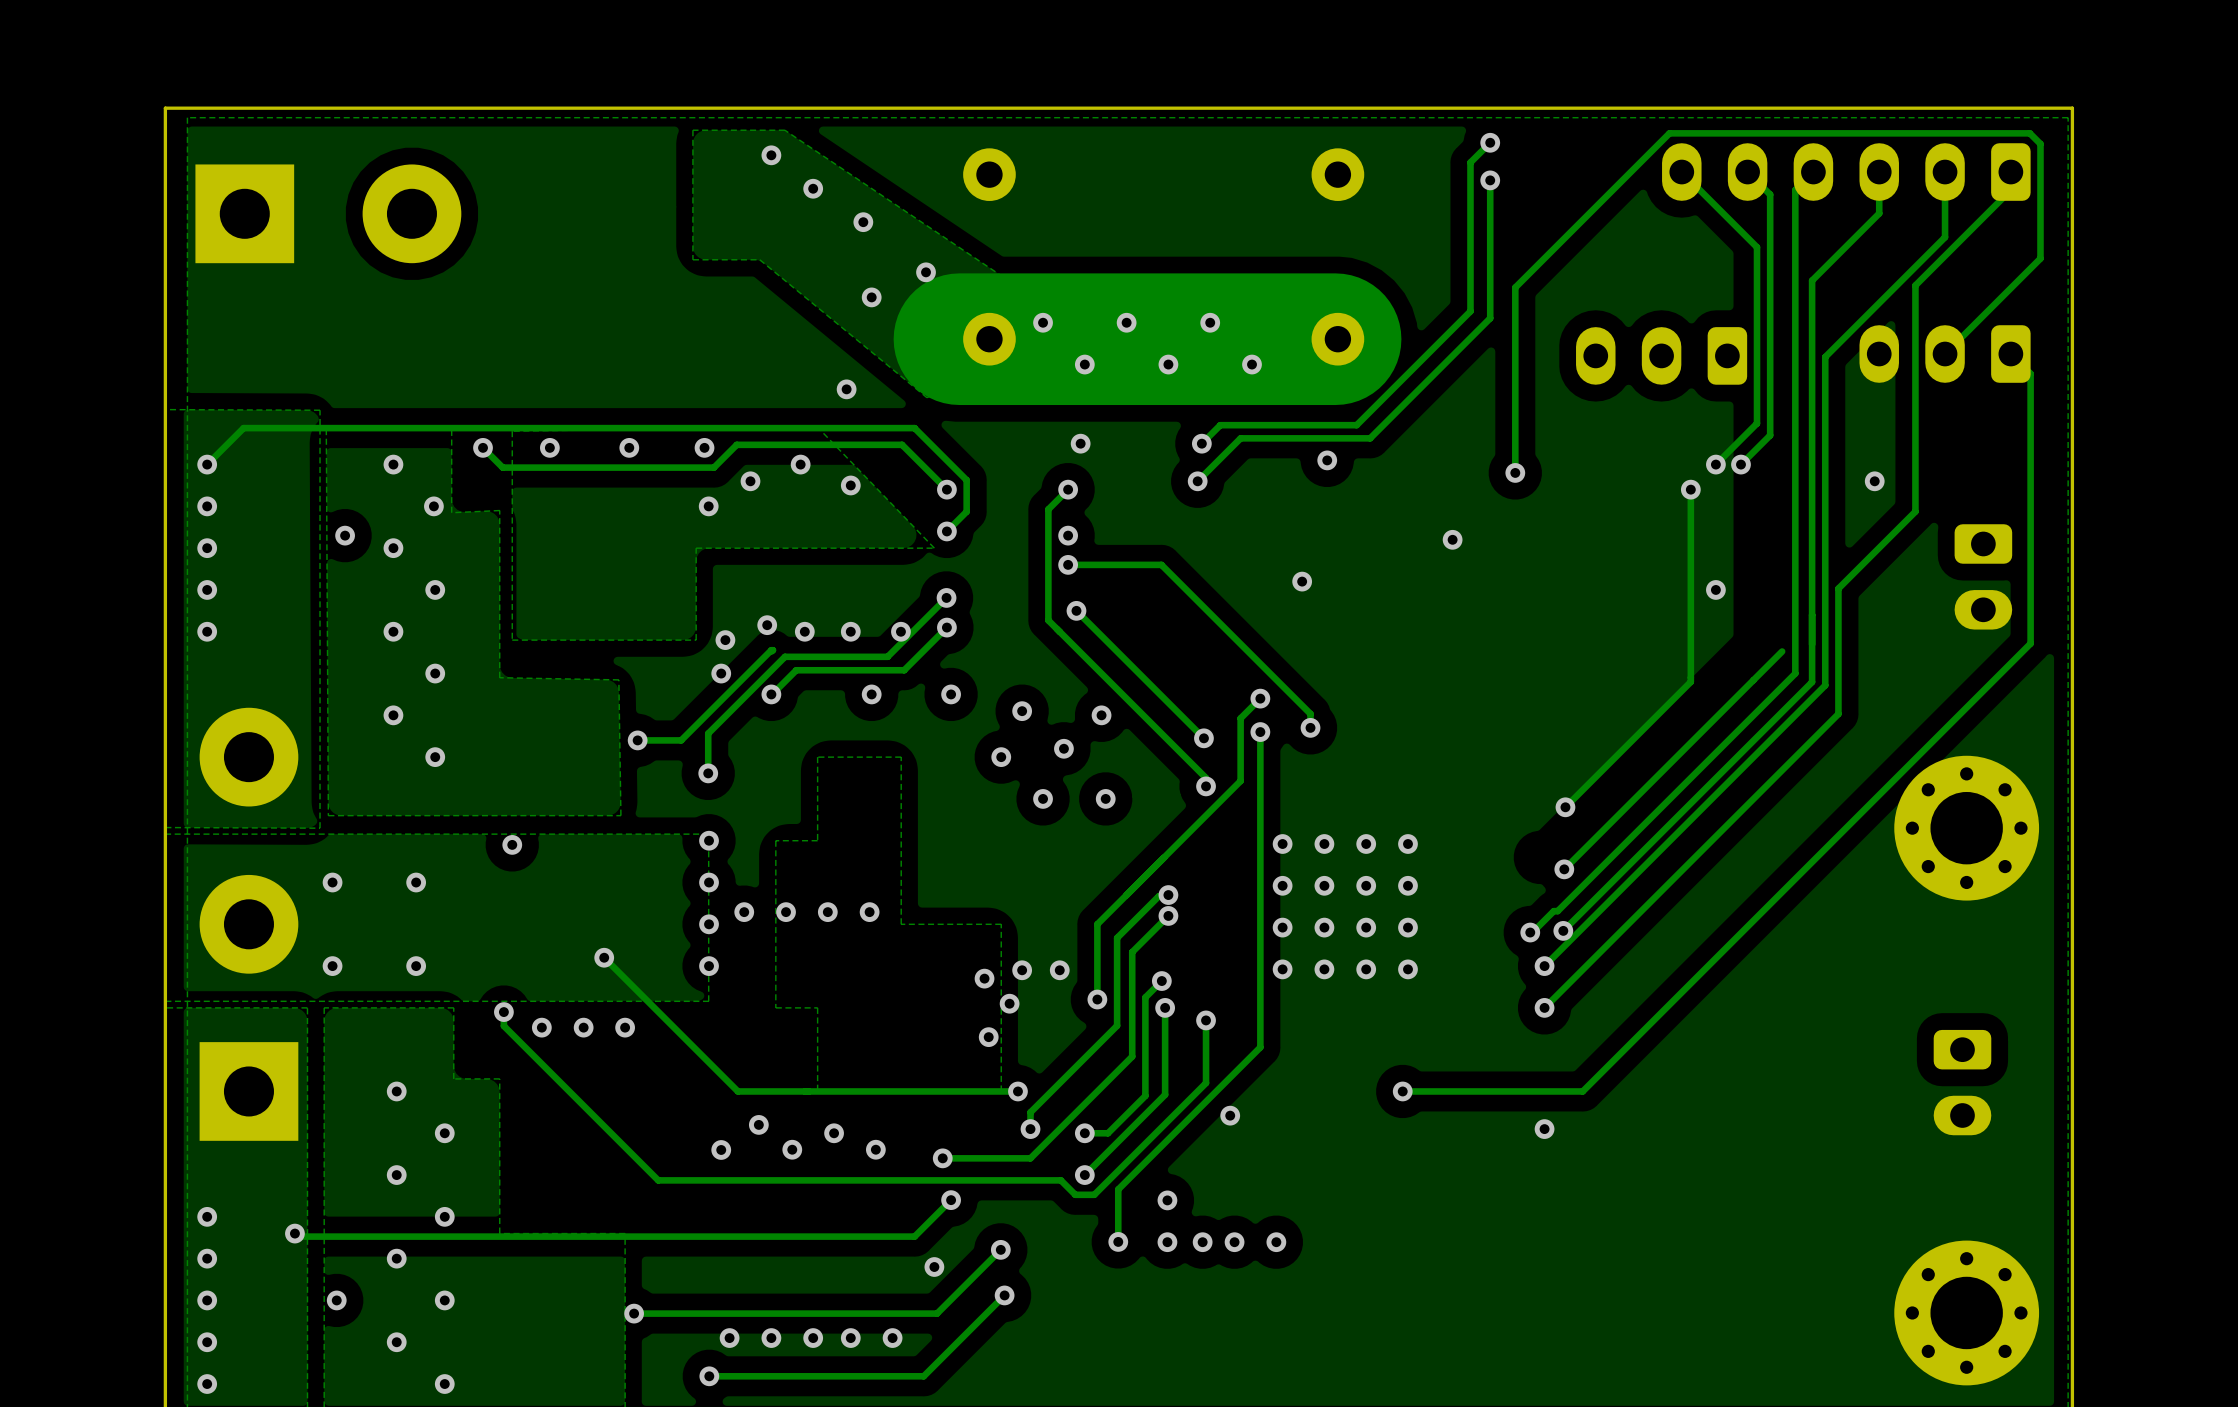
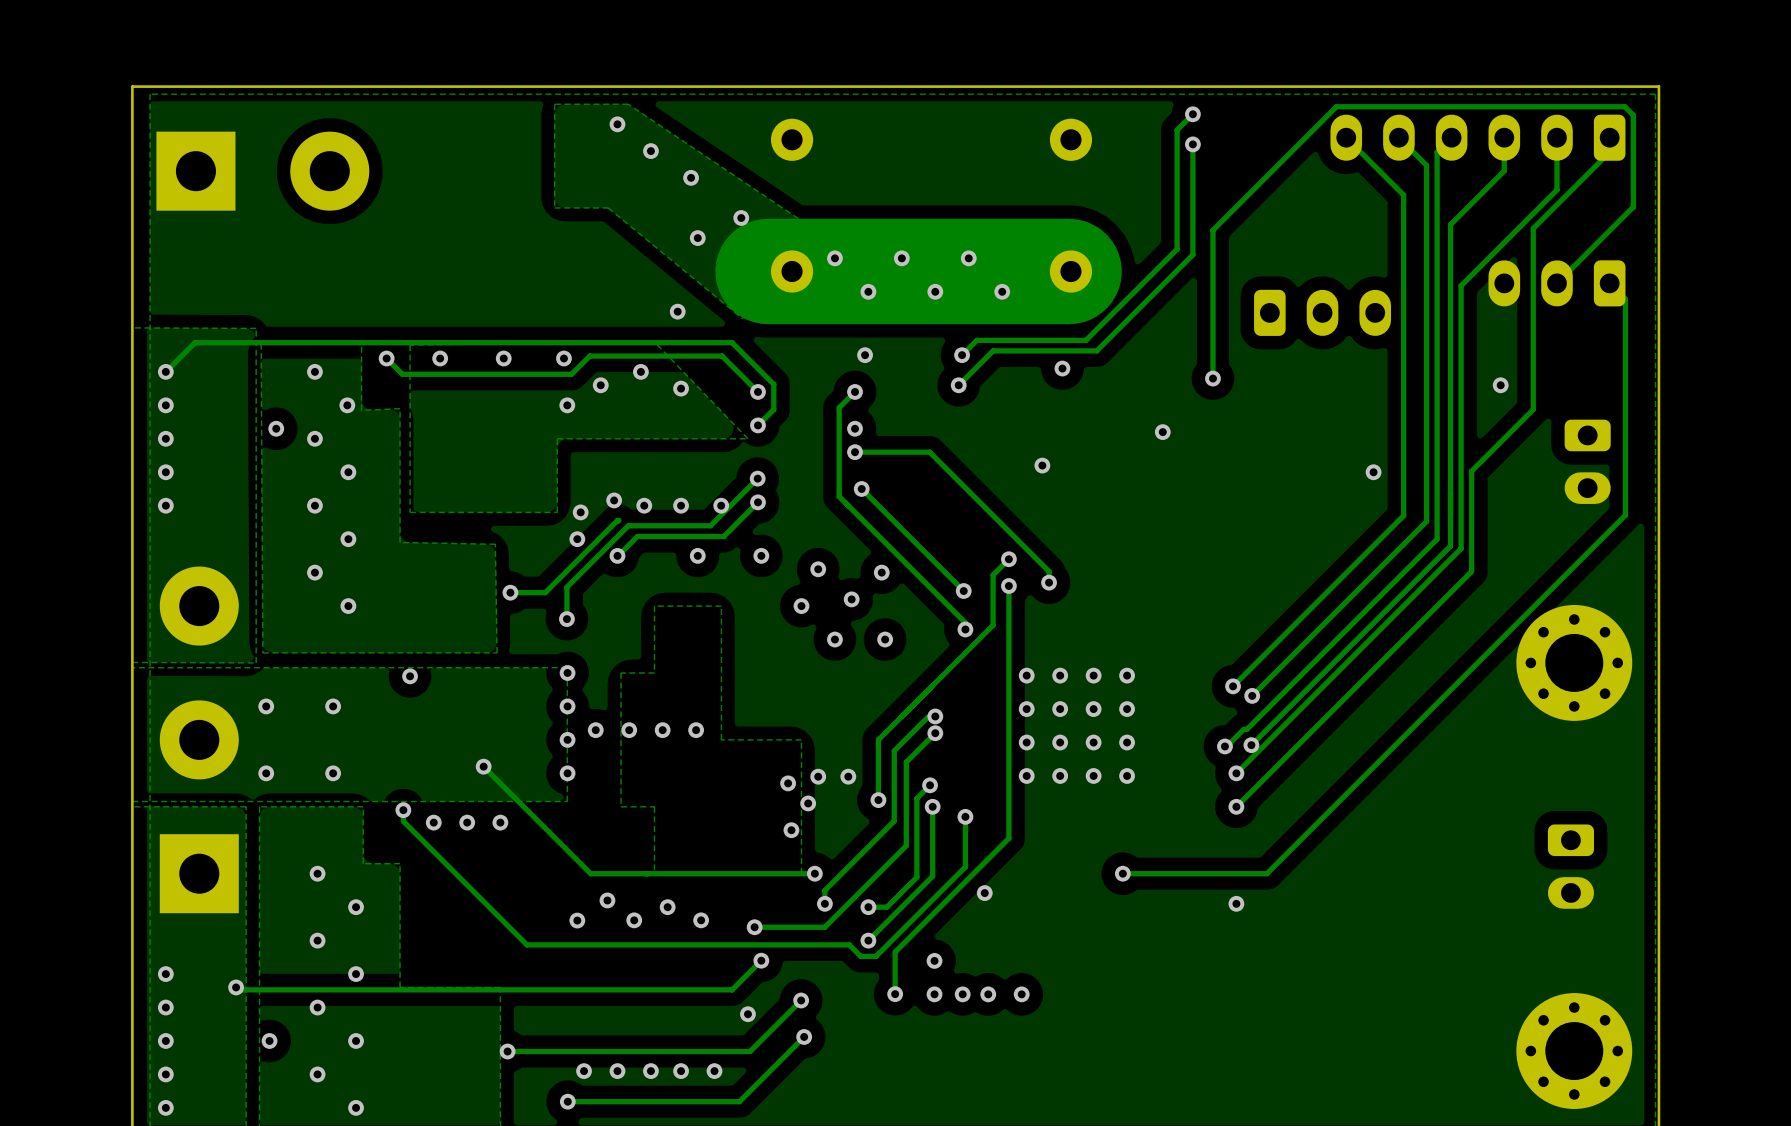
track: (1770, 194) (1770, 435) (1740, 464) -> (1417, 155) (1426, 165) (1426, 521)
track: (1753, 243) (1757, 247) (1757, 423) (1715, 464) -> (1403, 195) (1403, 515) (1233, 686)
part rotation: 0° (1661, 355) -> 180° (1322, 312)
via: (1715, 464) -> none
via: (1740, 464) -> none
track: (1690, 489) (1690, 681) (1565, 807) -> none
via: (1690, 489) -> none
via position: (1565, 807) -> (1233, 686)

